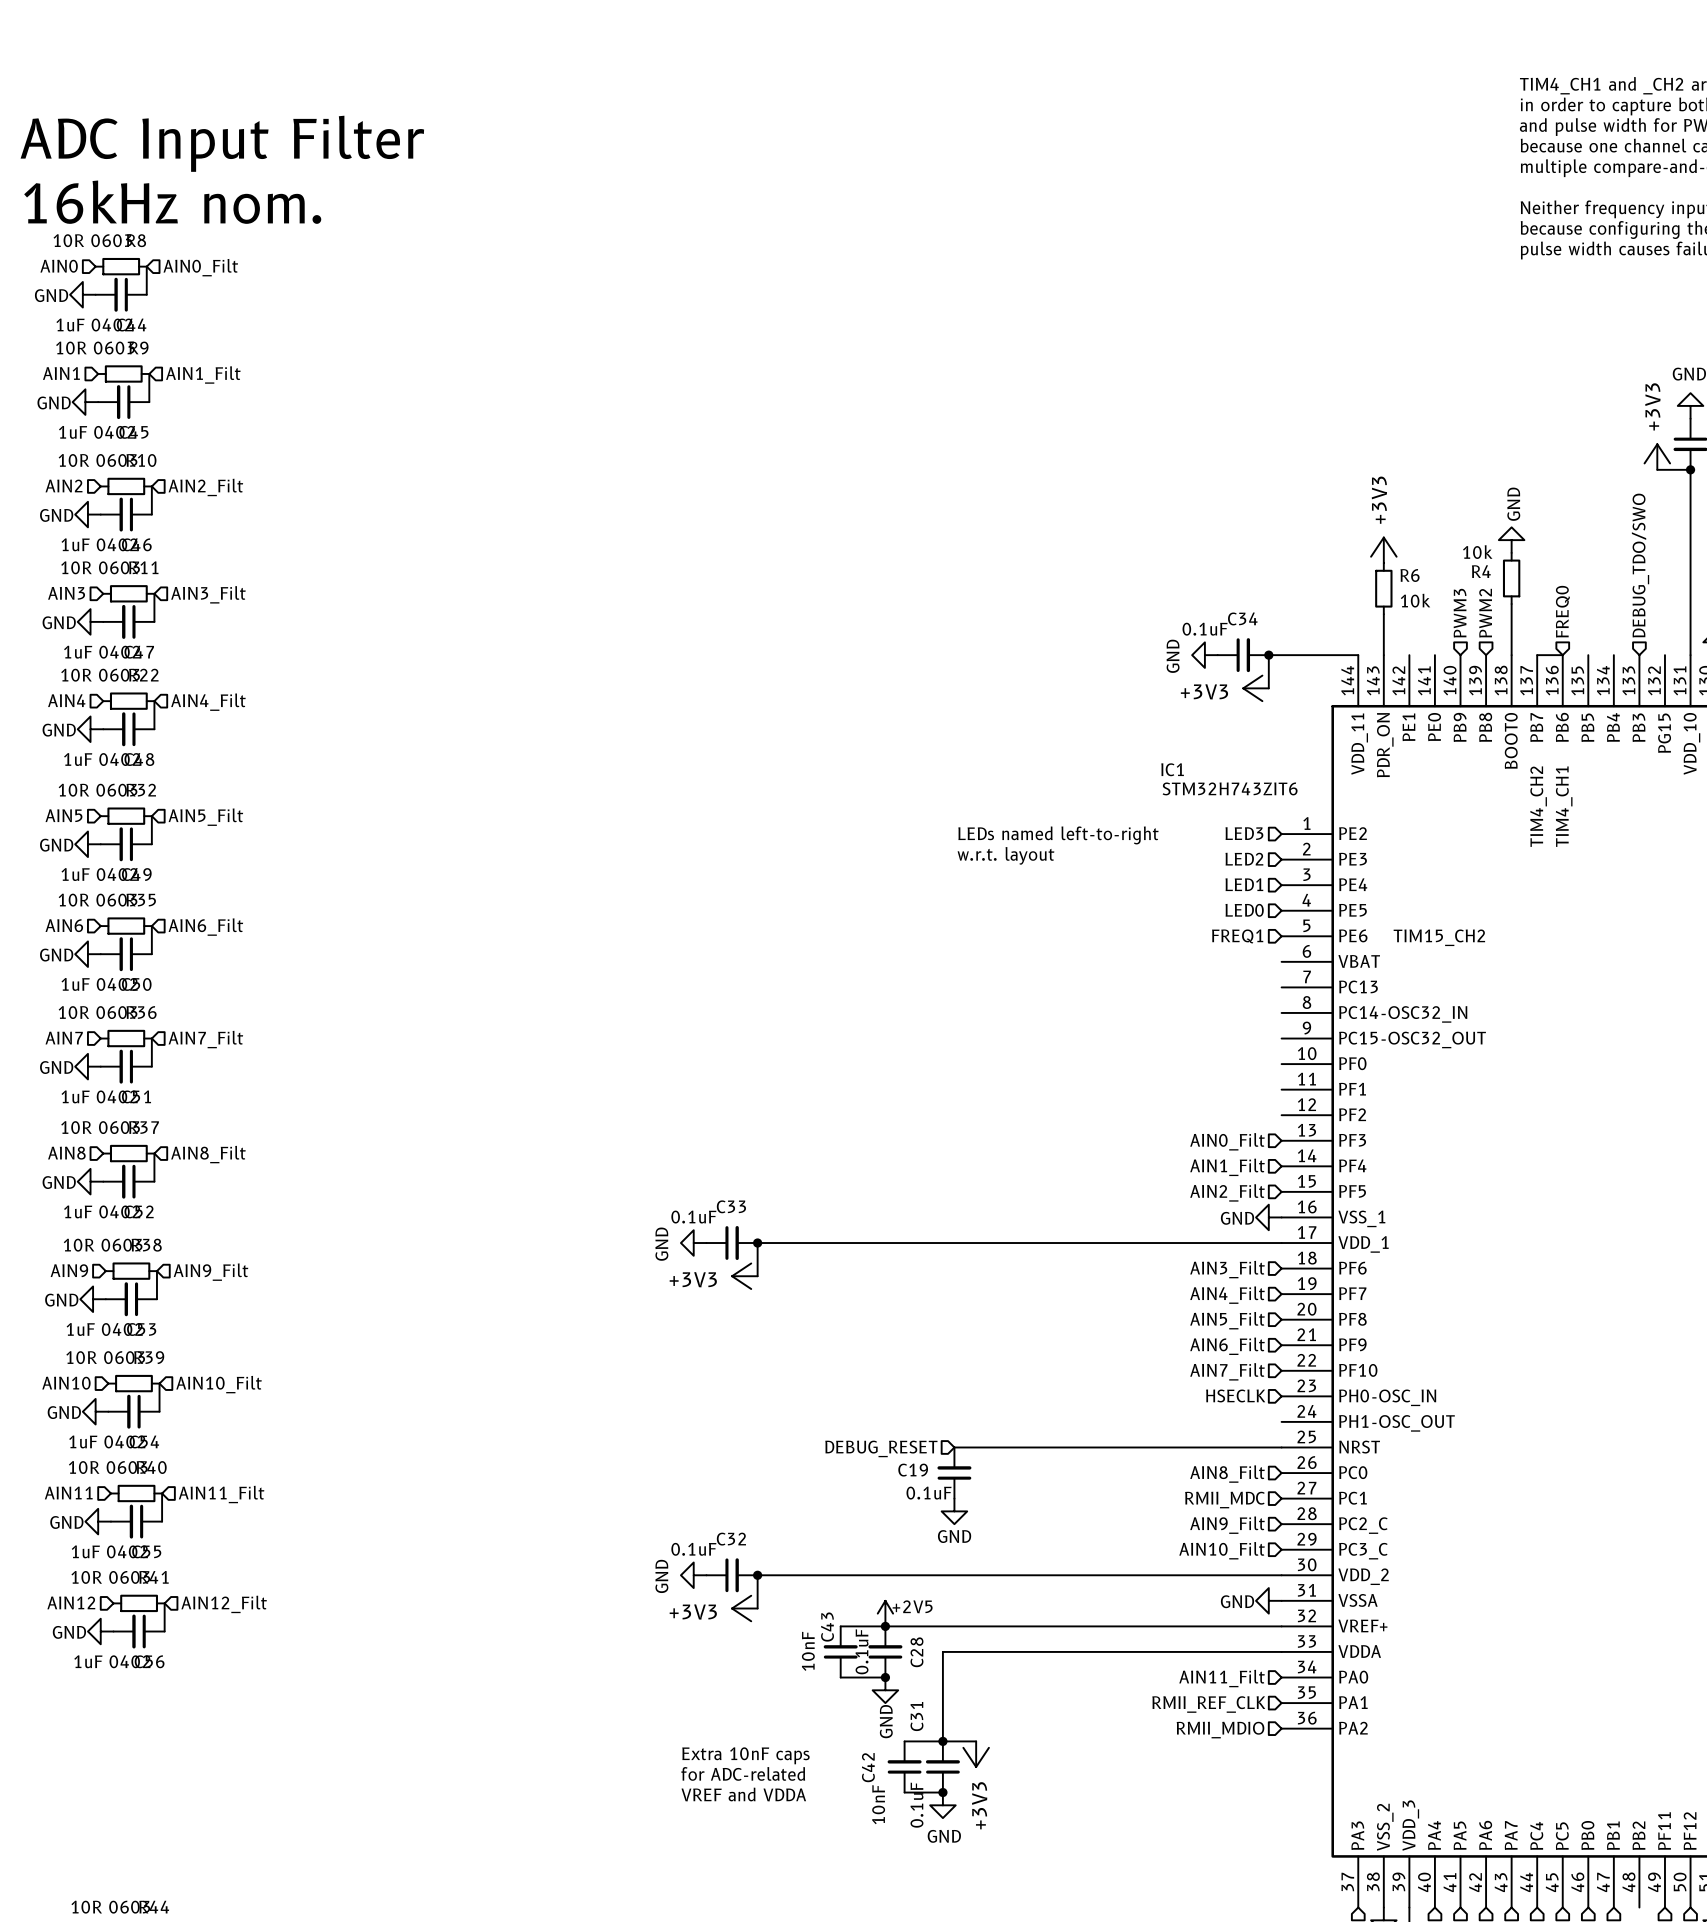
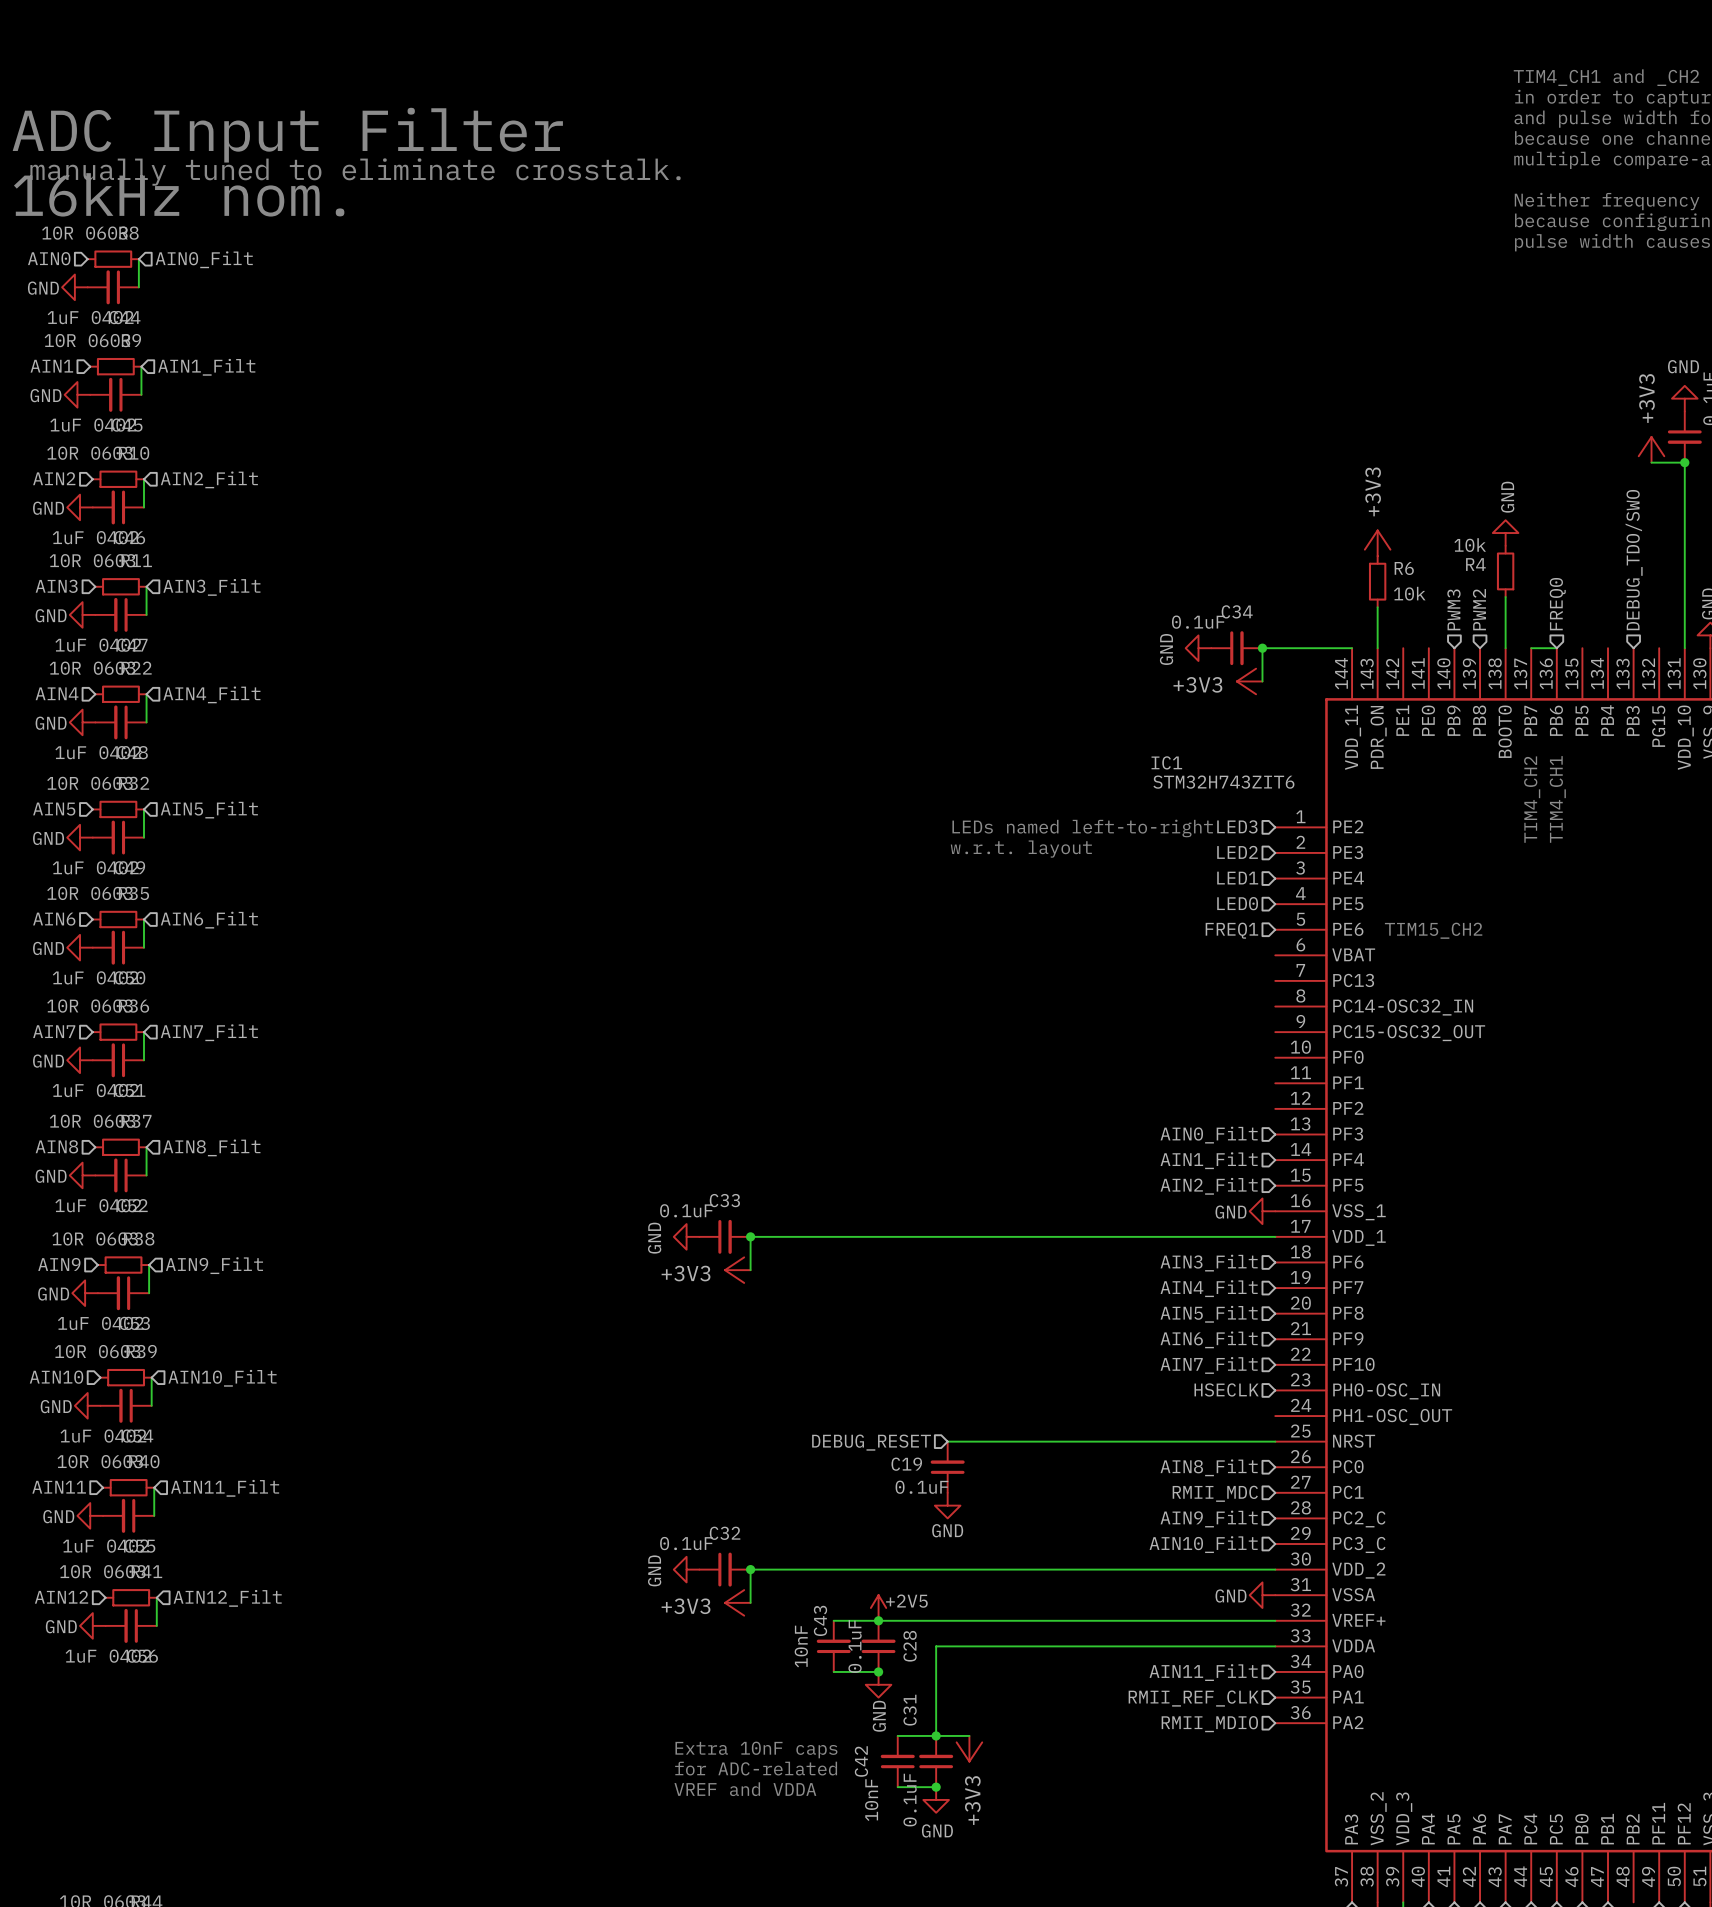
text: none -> manually tuned to eliminate crosstalk. (355, 172)

